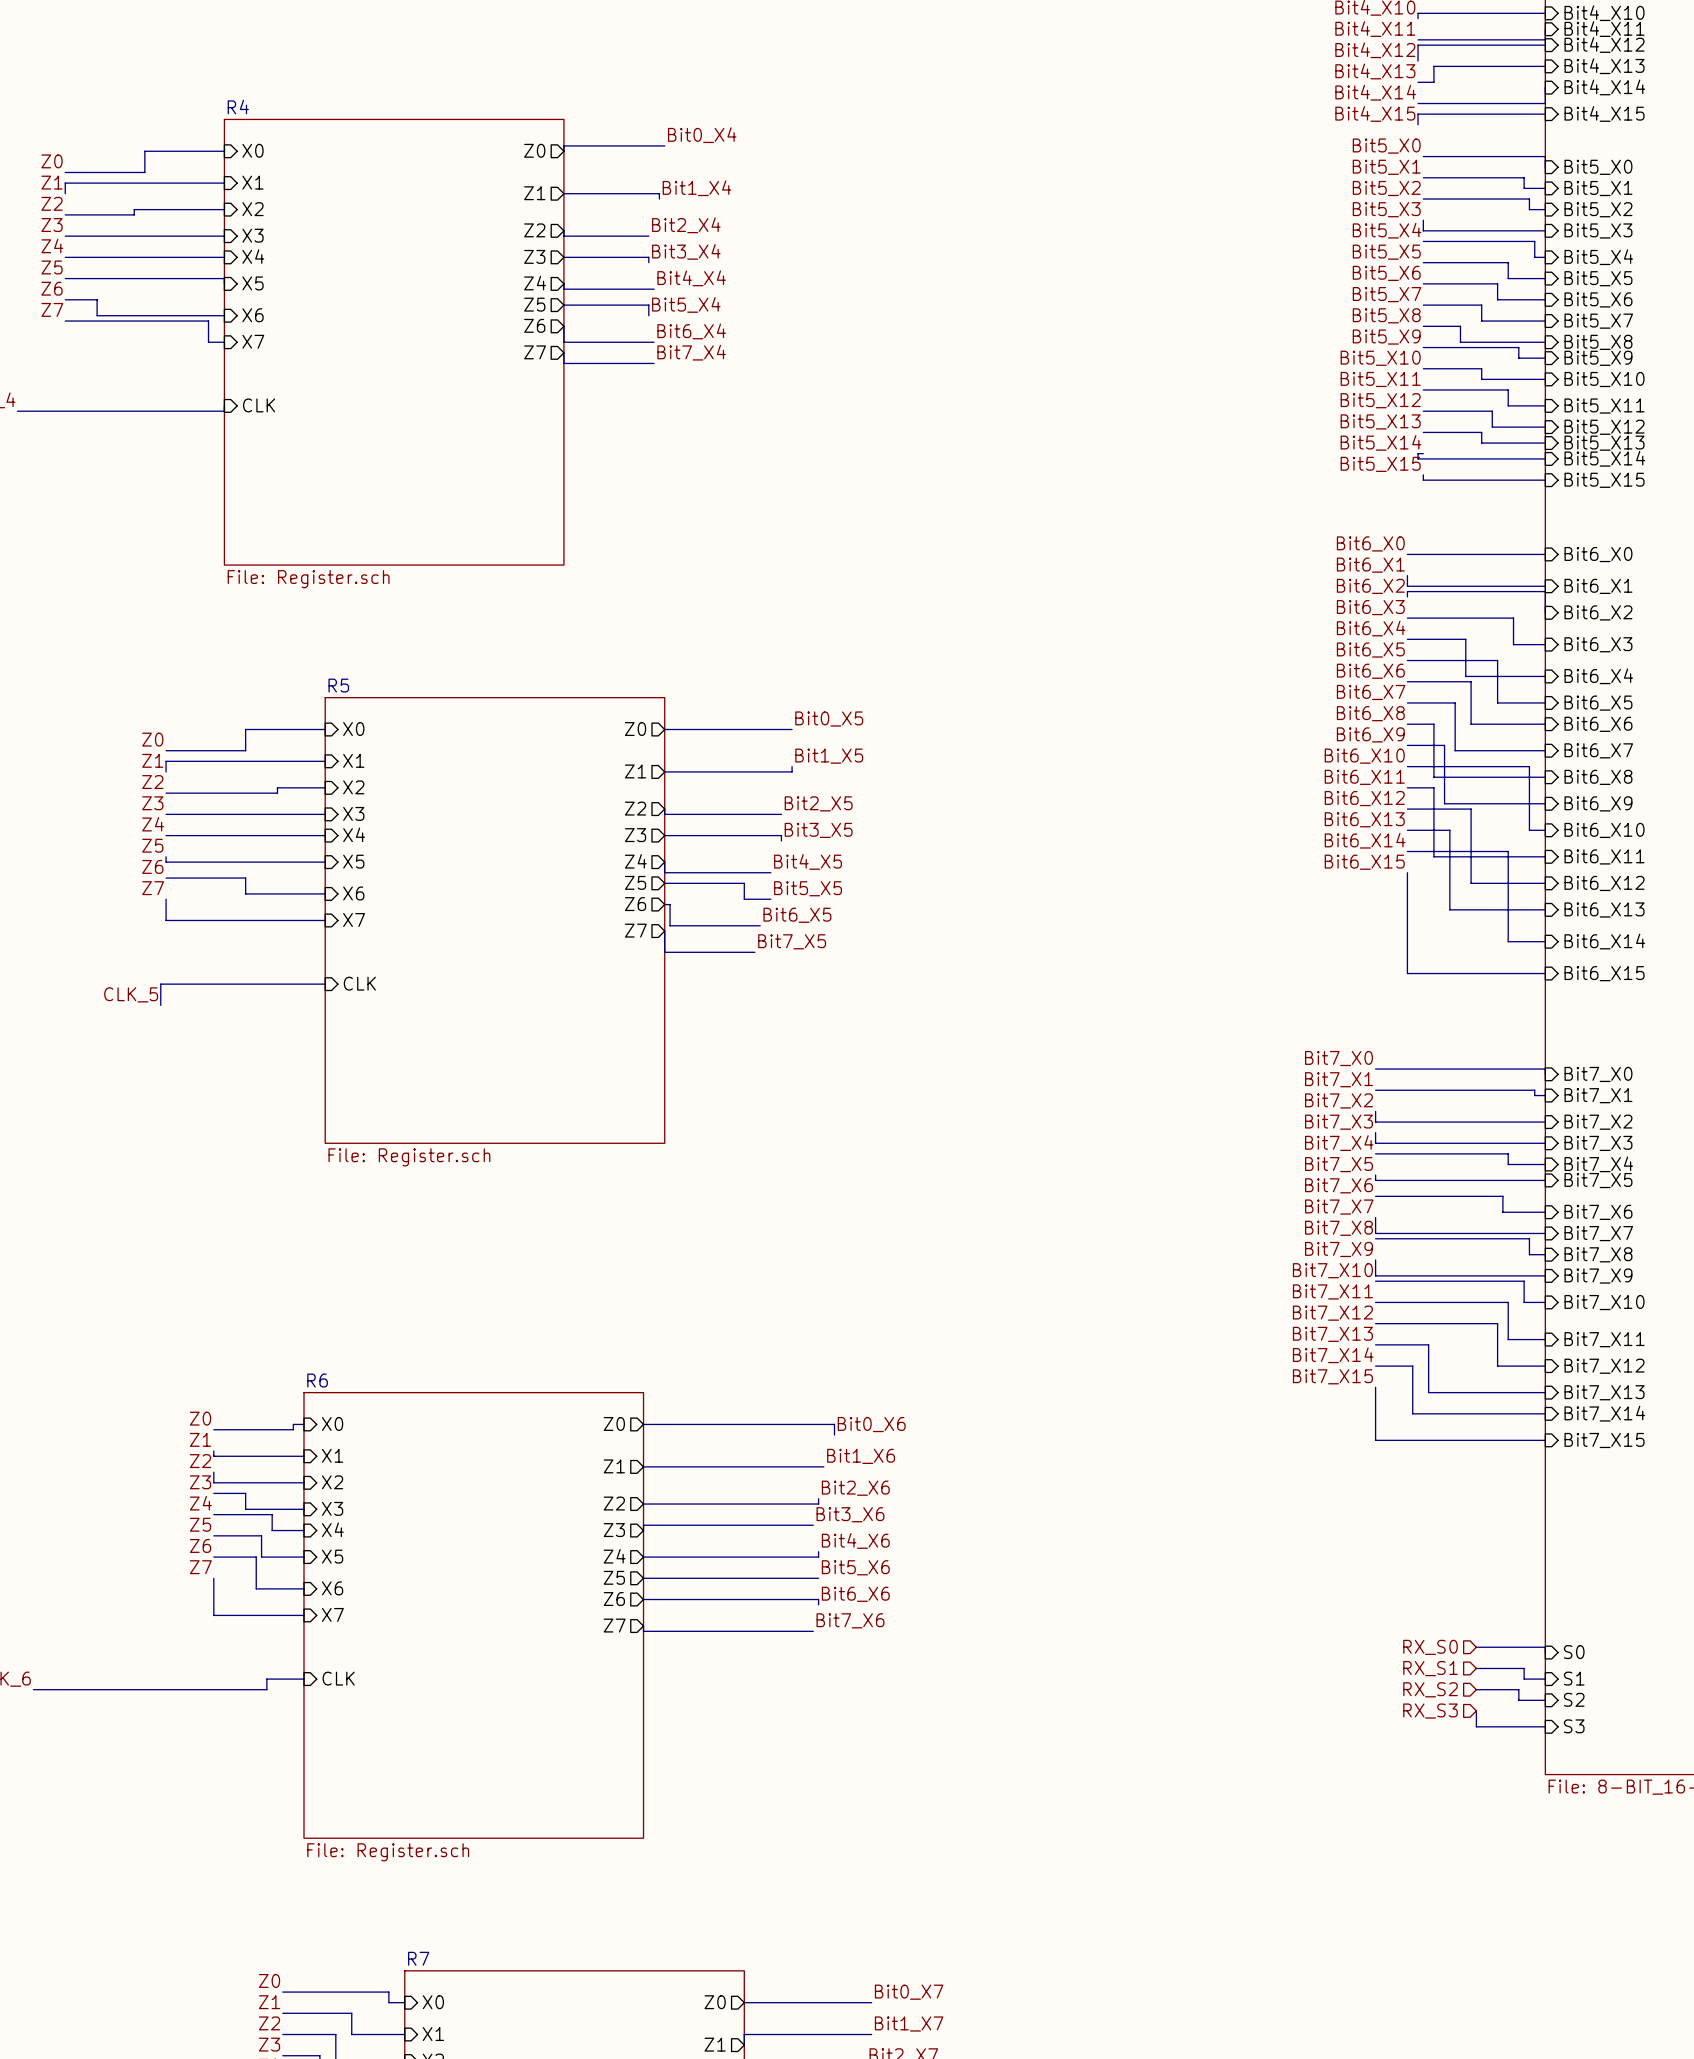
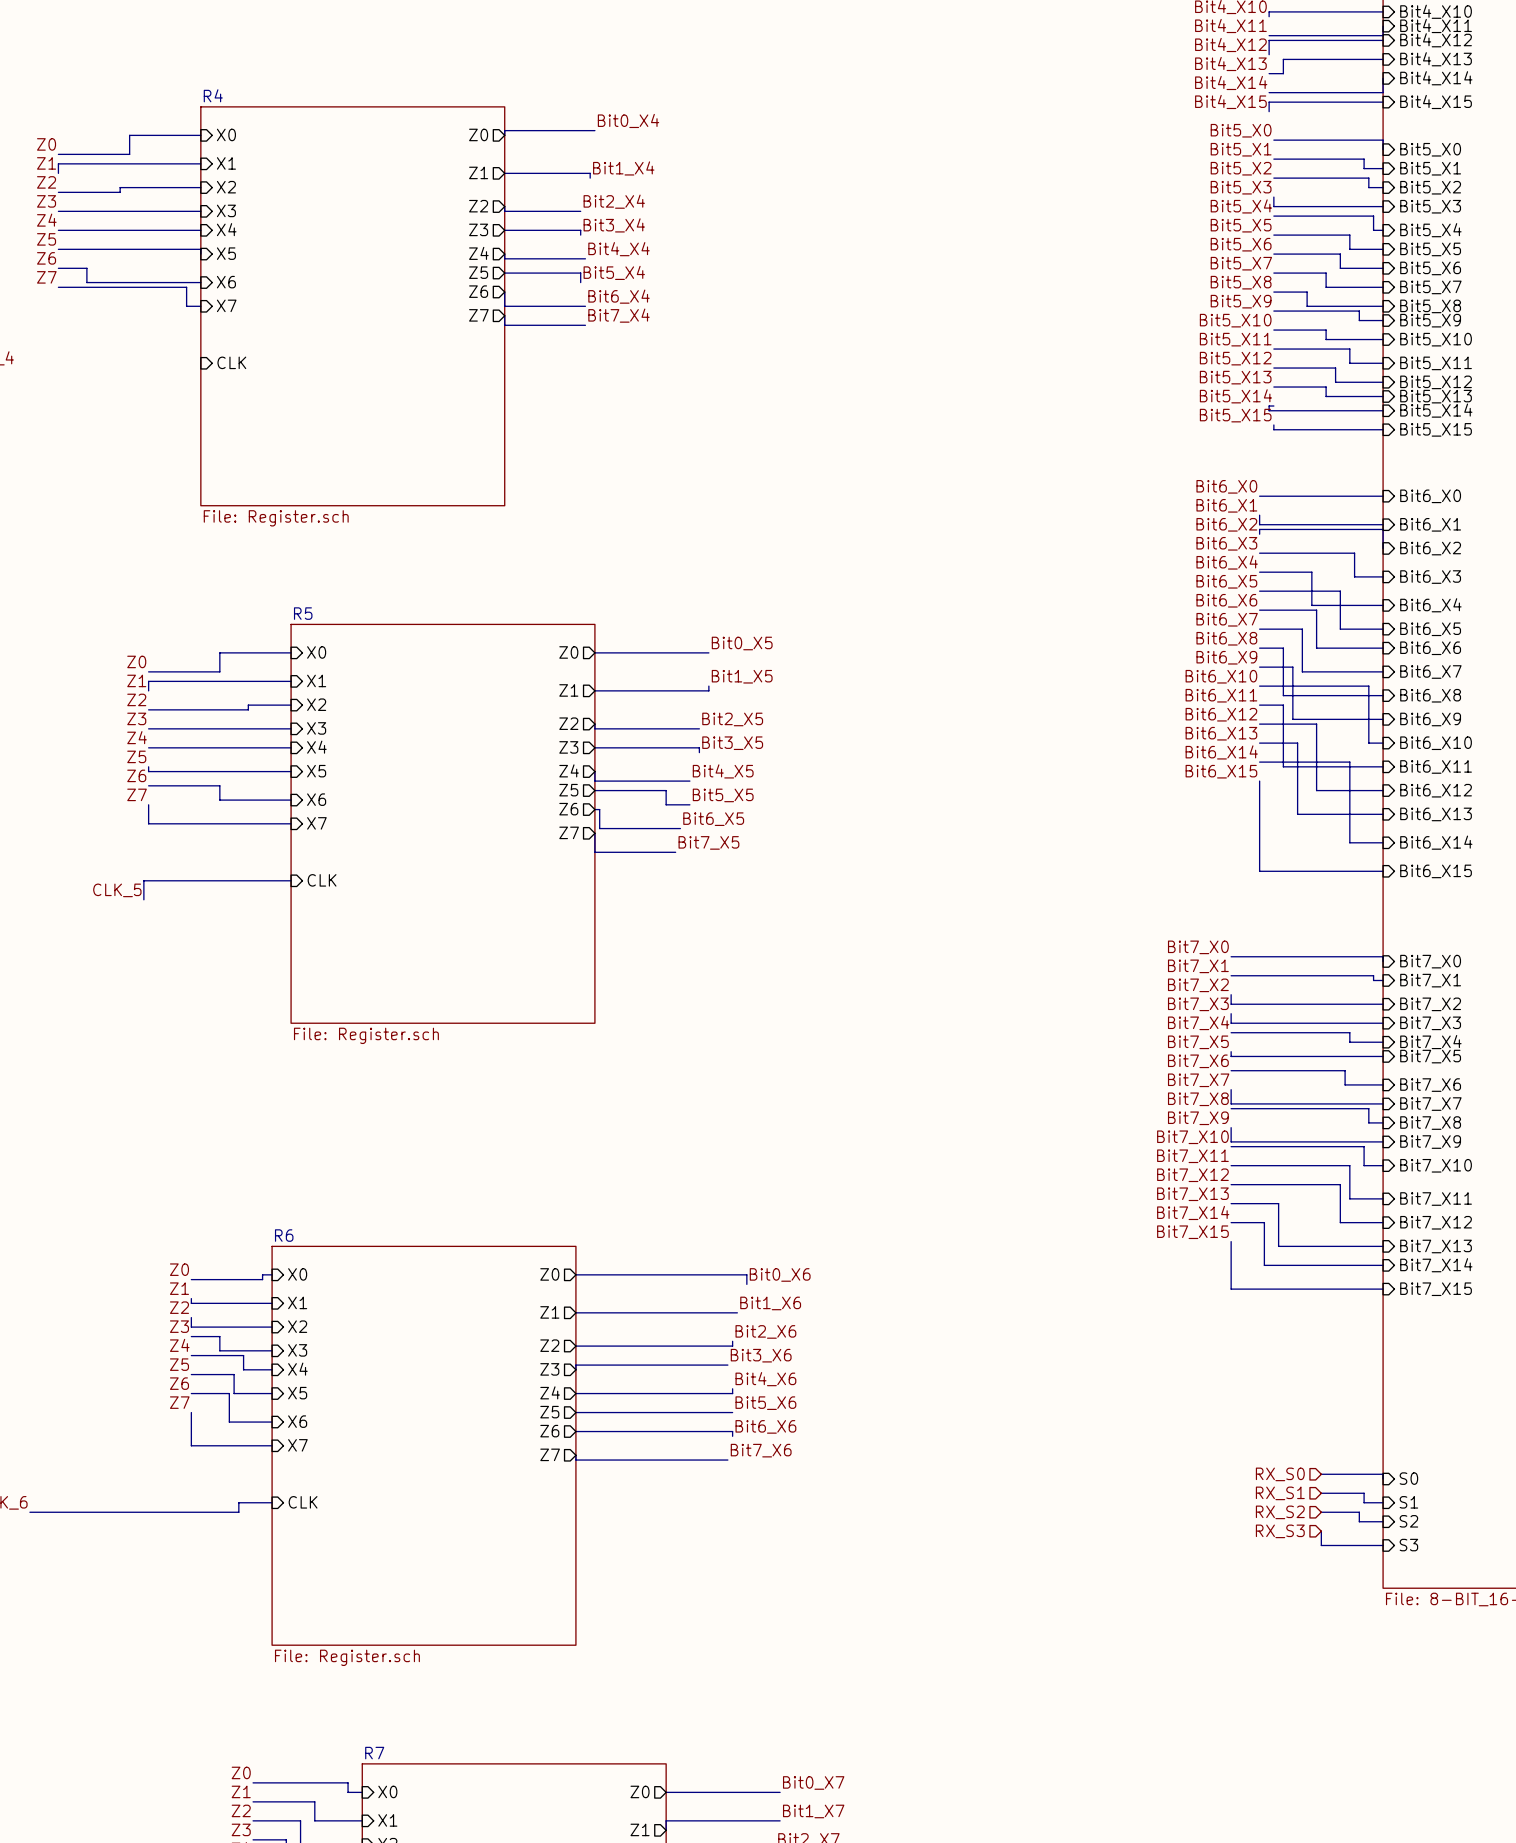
wire: (224, 405) (224, 411) (17, 411) -> none

